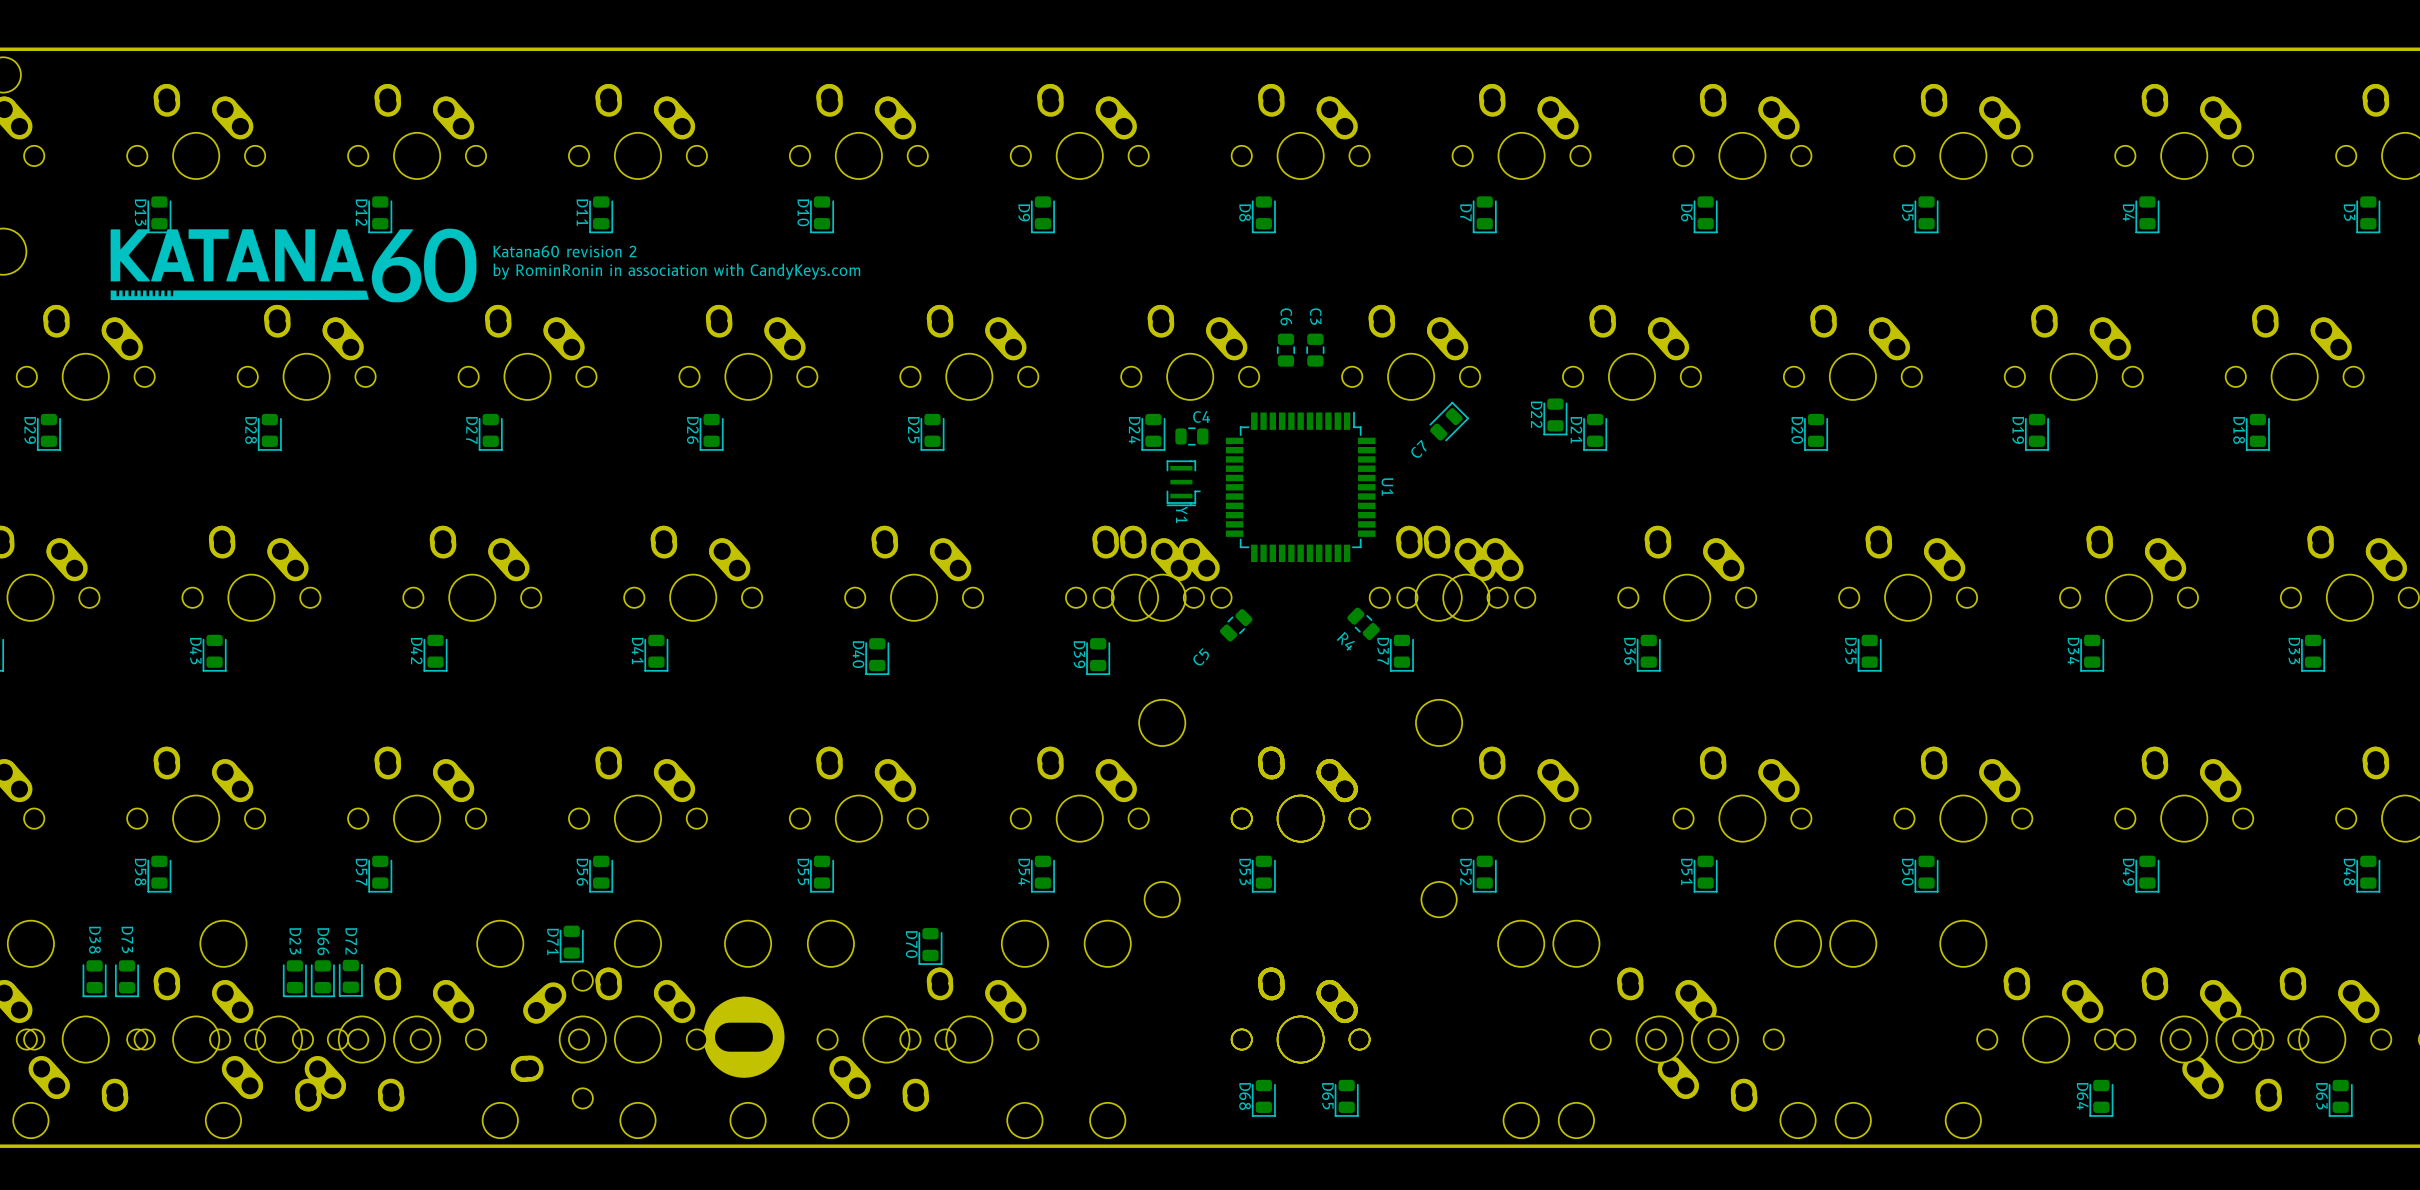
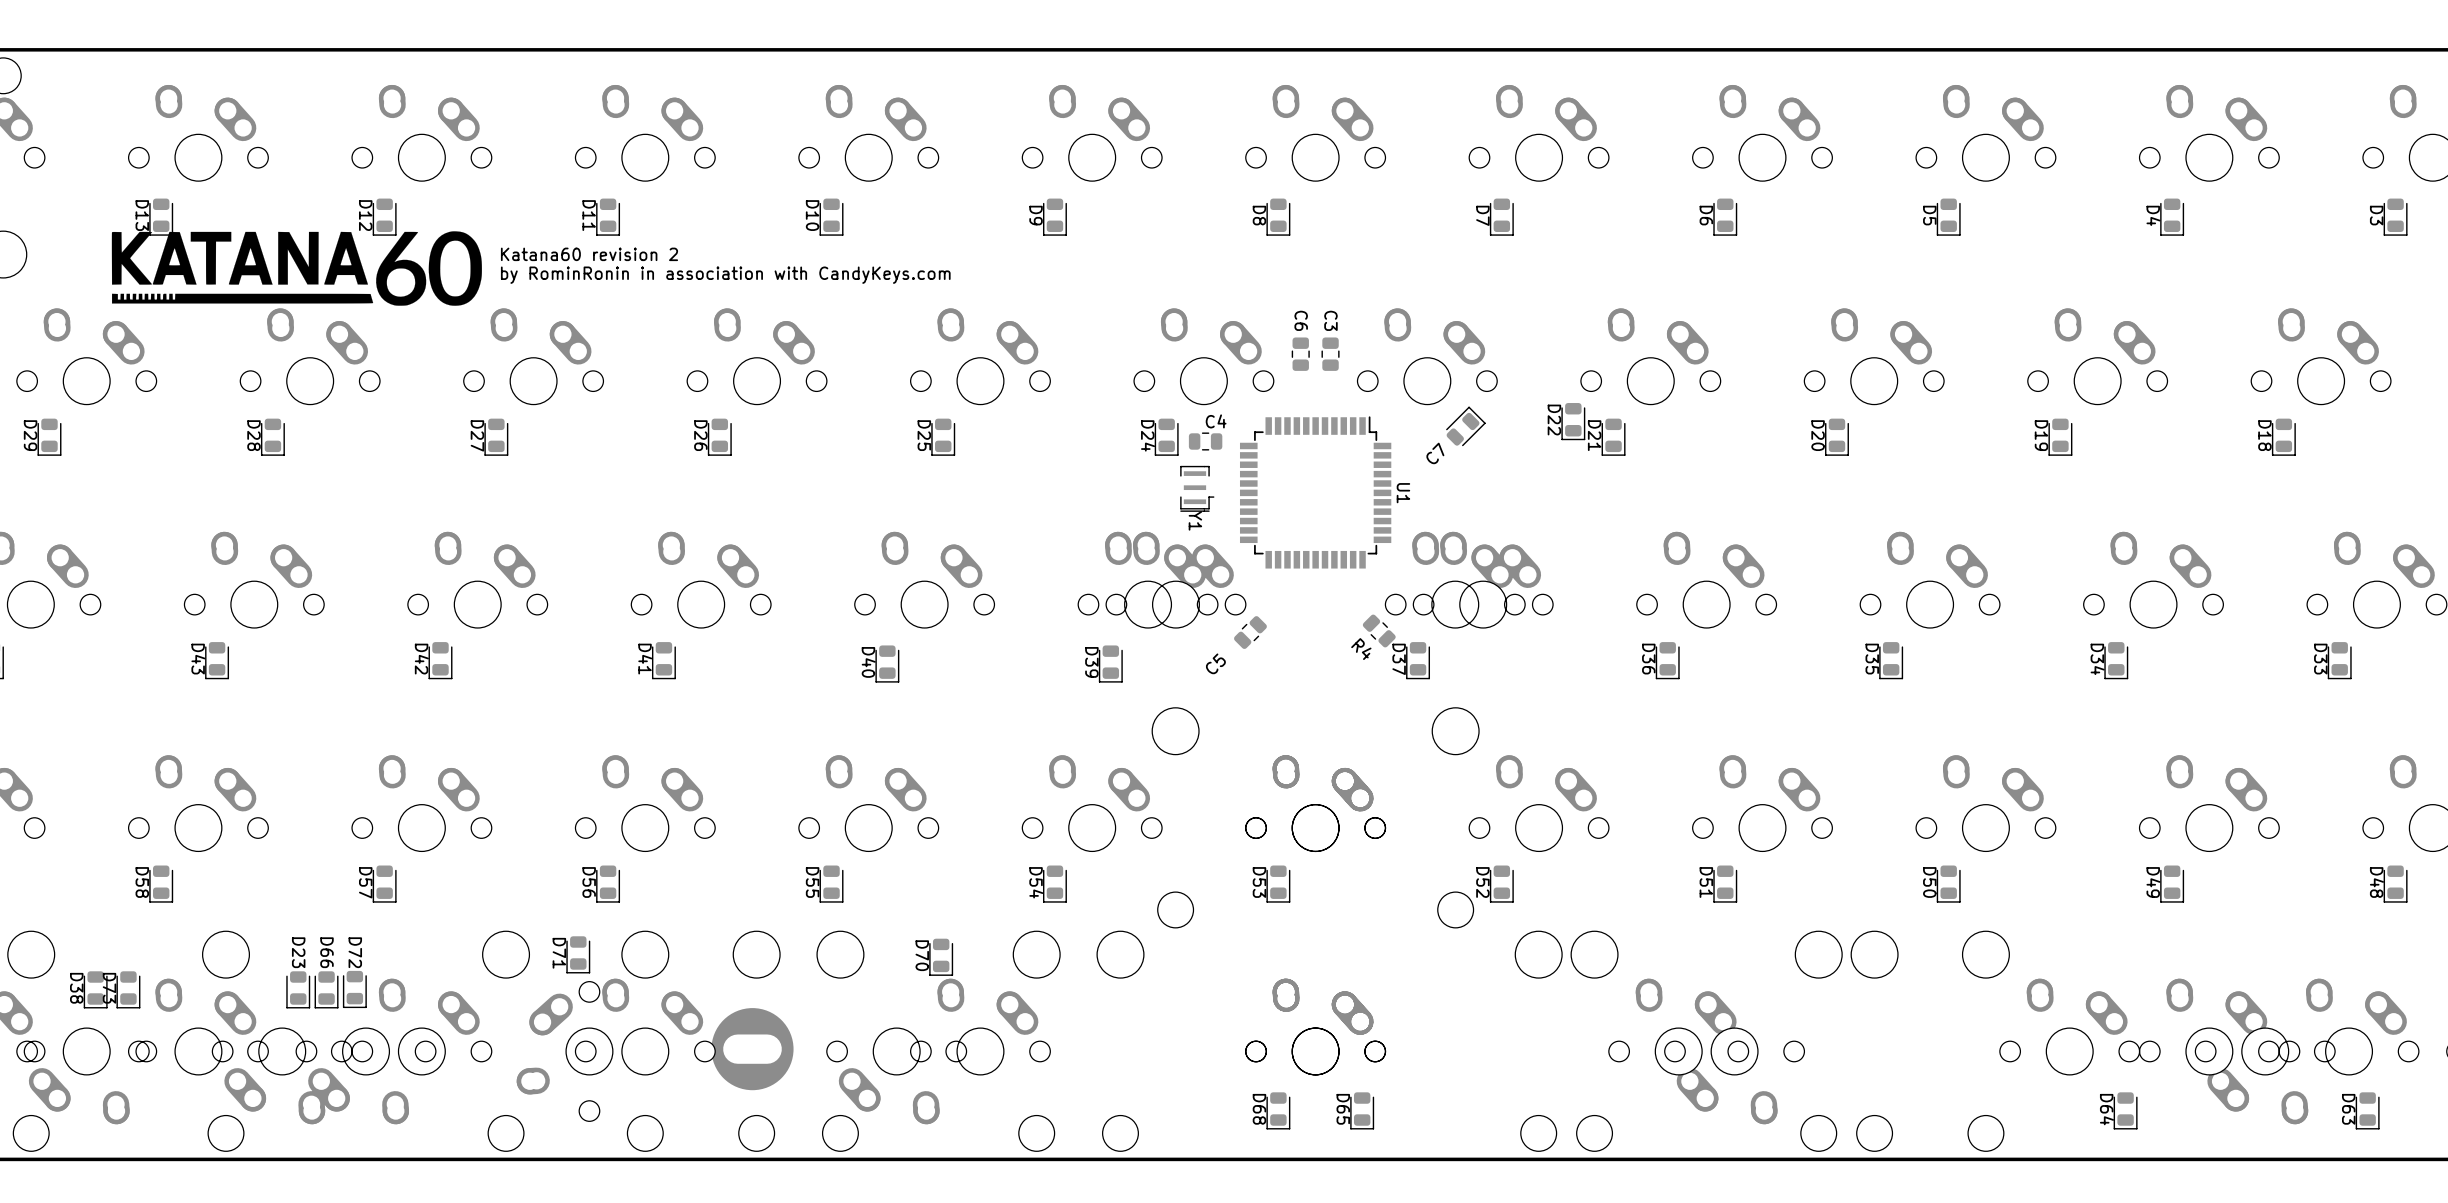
D73 name position: D73 (127, 939) -> D73 (109, 988)
D38 name position: D38 (94, 940) -> D38 (76, 988)

